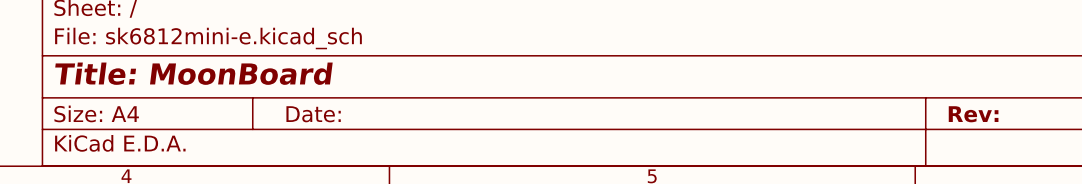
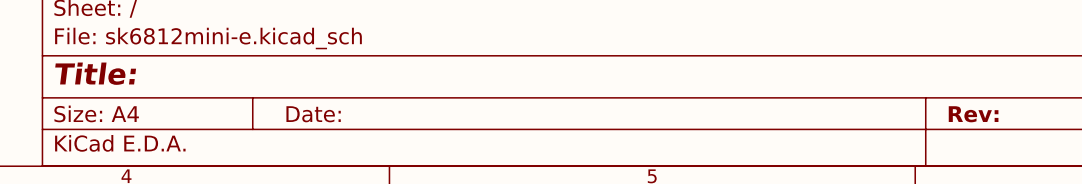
title block: Title: MoonBoard (193, 73) -> Title: (95, 73)

